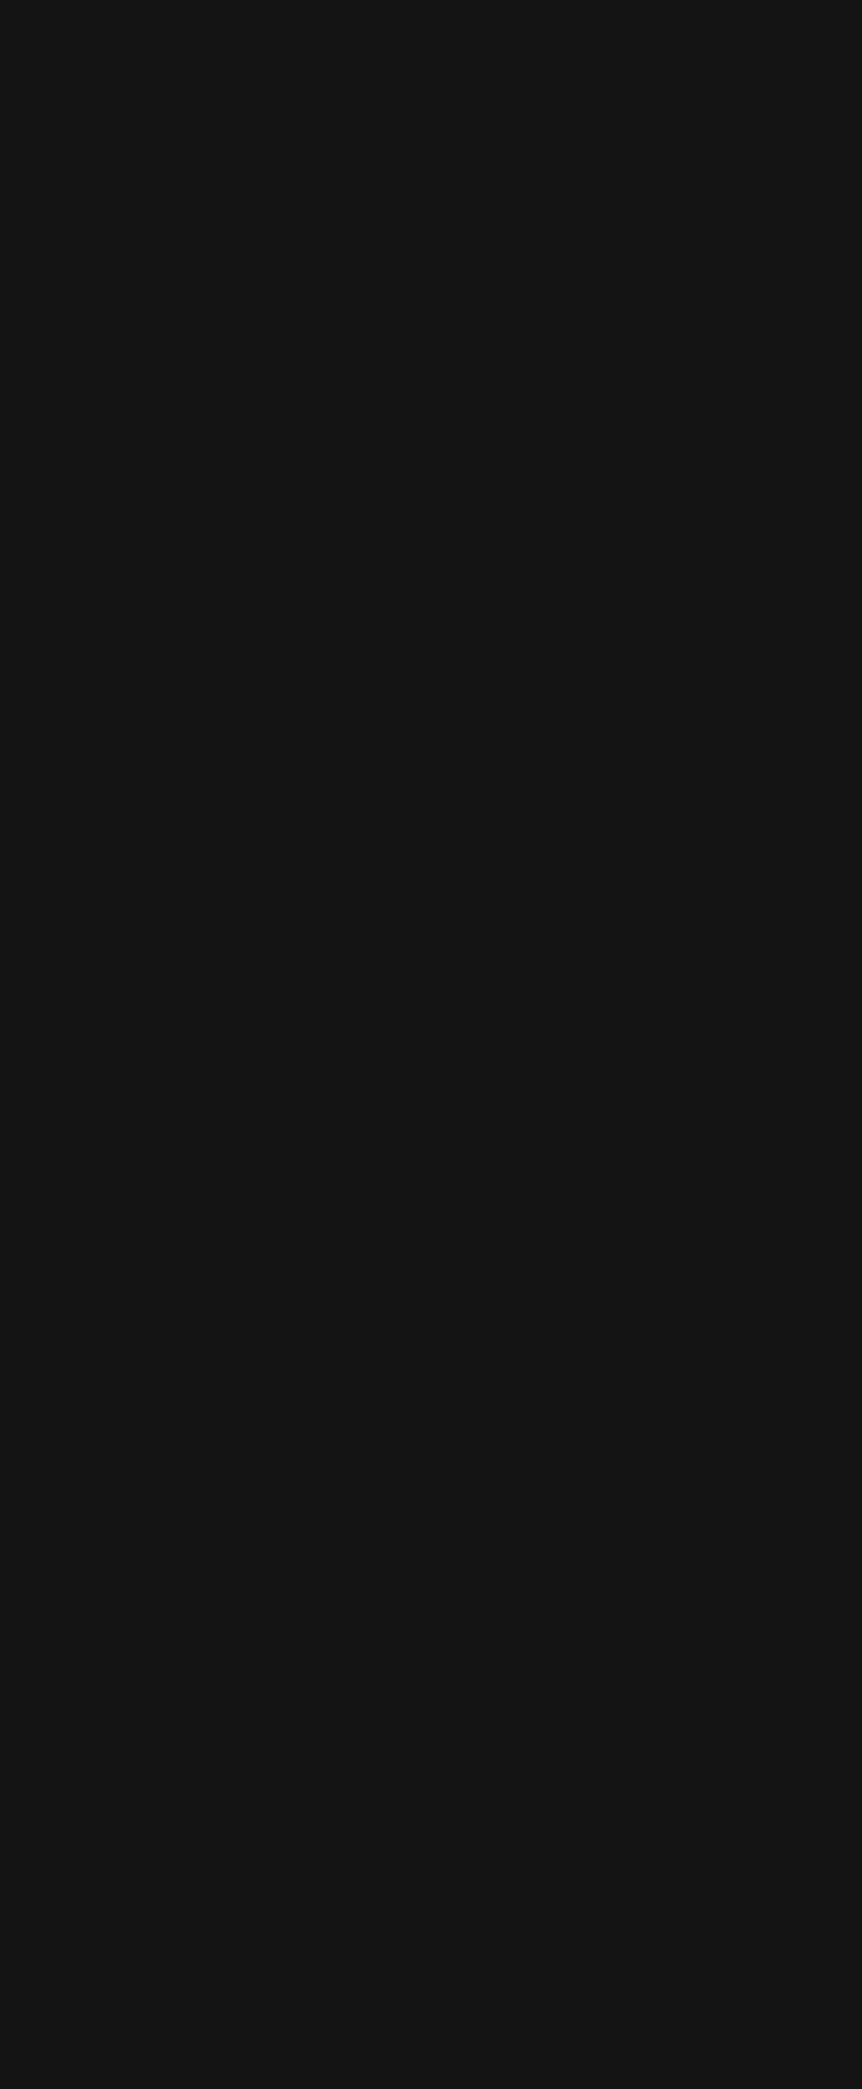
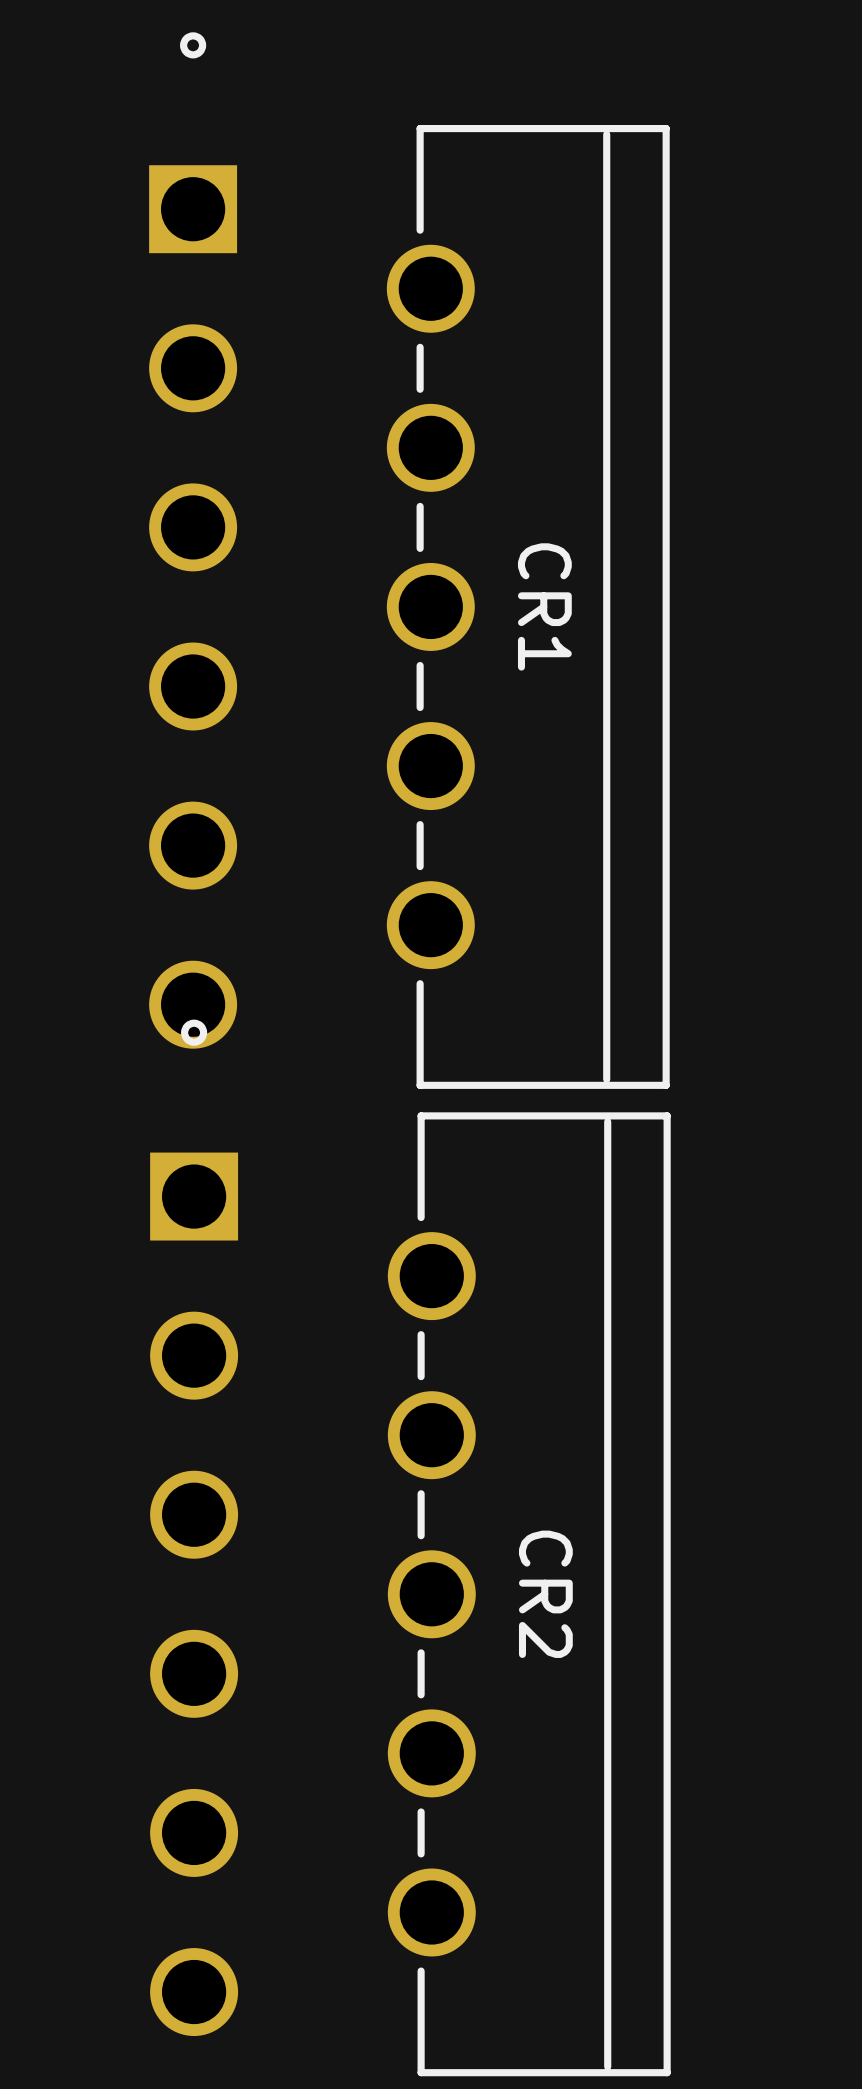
CR1: none -> (409, 560)
CR2: none -> (410, 1547)

